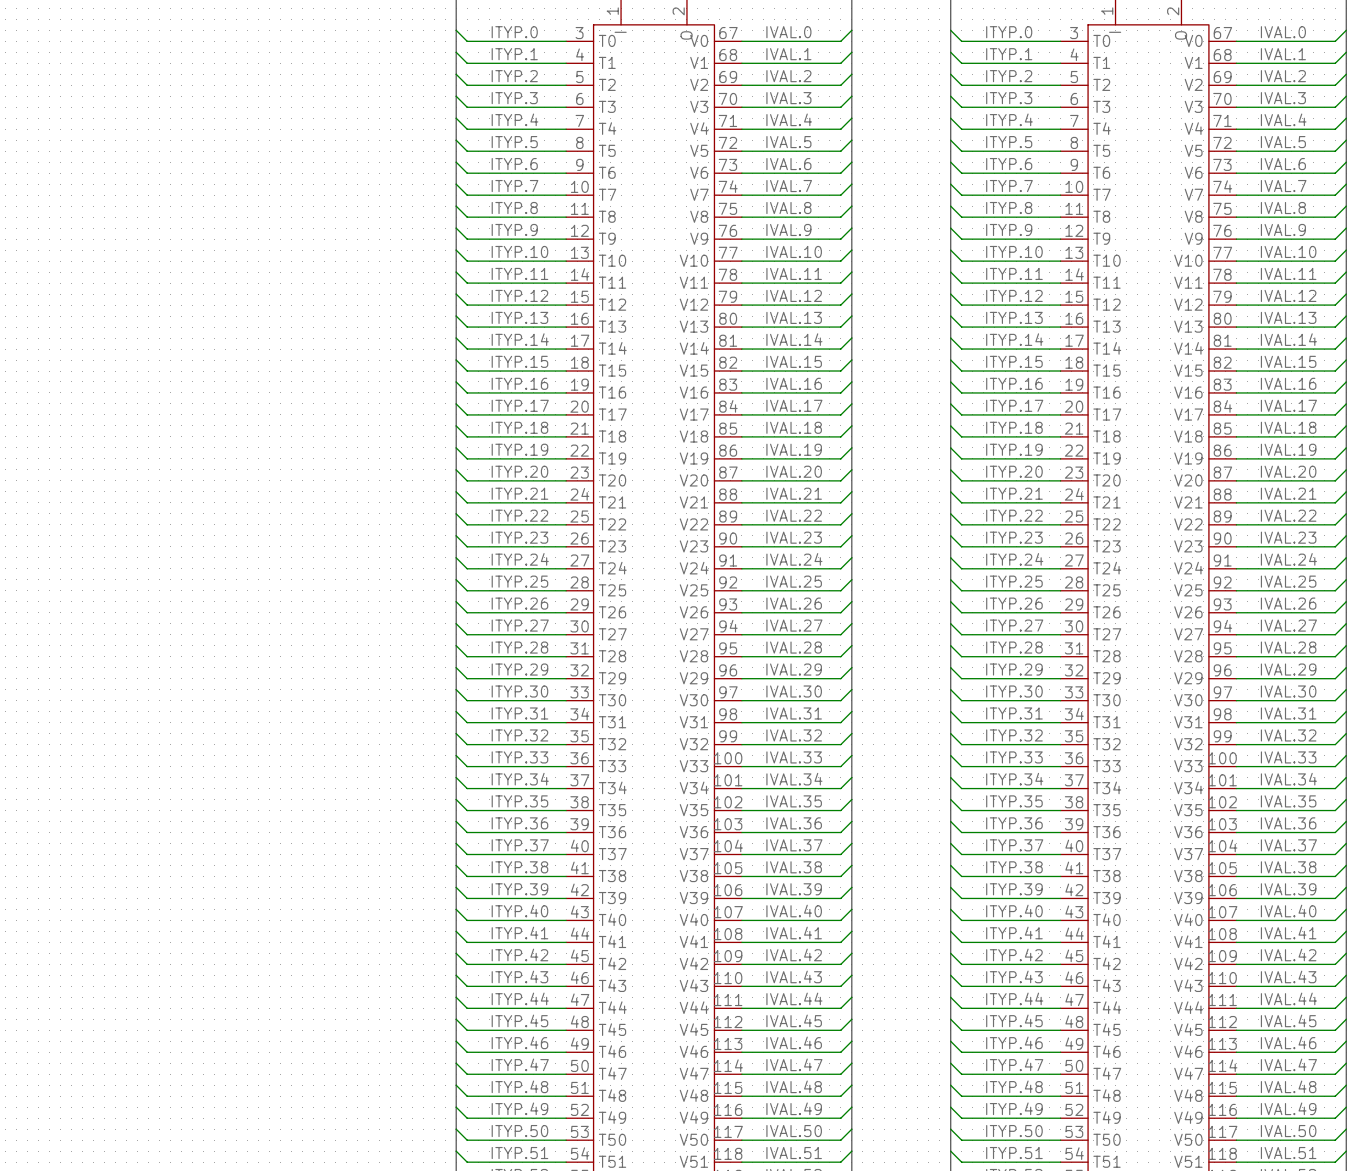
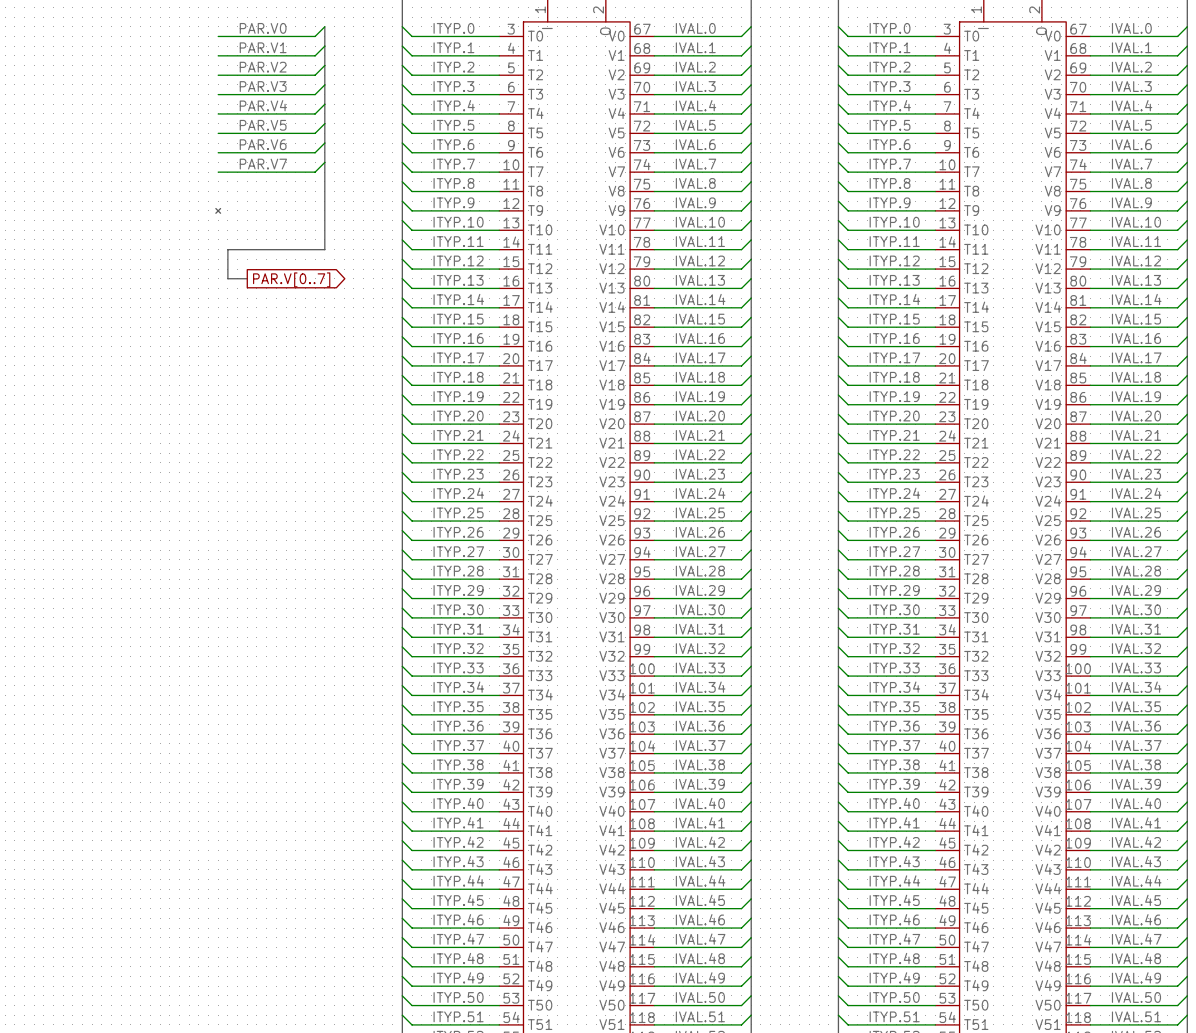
wire: none -> (324, 26) (315, 36) (218, 36)
bus: none -> (324, 26) (324, 249) (227, 249) (227, 278) (247, 278)
label: none -> PAR.V0 (263, 28)
wire: none -> (324, 46) (315, 55) (218, 55)
label: none -> PAR.V1 (263, 47)
wire: none -> (324, 65) (315, 75) (218, 75)
label: none -> PAR.V2 (263, 67)
wire: none -> (324, 84) (315, 94) (218, 94)
label: none -> PAR.V3 (263, 86)
wire: none -> (324, 104) (315, 113) (218, 113)
label: none -> PAR.V4 (263, 105)
wire: none -> (324, 123) (315, 133) (218, 133)
label: none -> PAR.V5 (263, 125)
wire: none -> (324, 143) (315, 152) (218, 152)
label: none -> PAR.V6 (263, 144)
wire: none -> (324, 162) (315, 172) (218, 172)
label: none -> PAR.V7 (263, 164)
no-connect mark: none -> (218, 210)
global label: none -> PAR.V[0..7] (291, 279)

